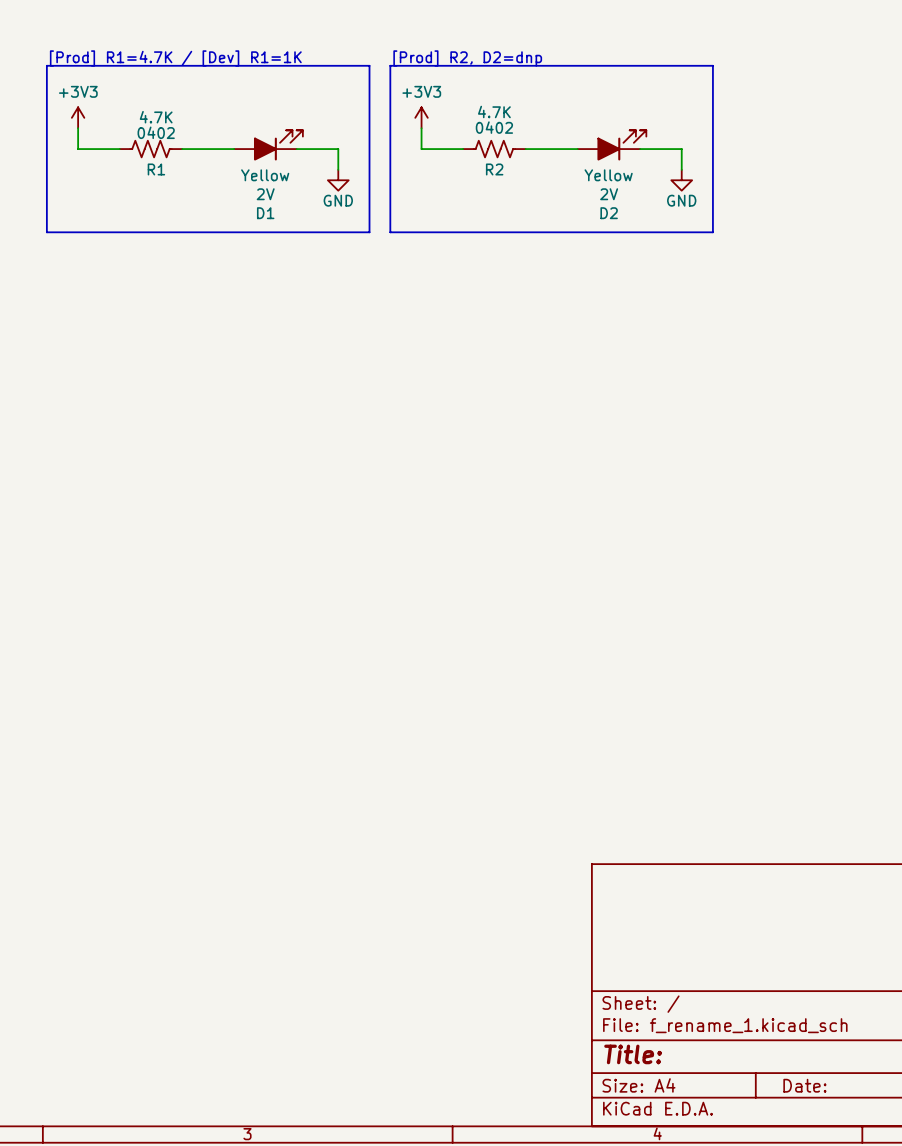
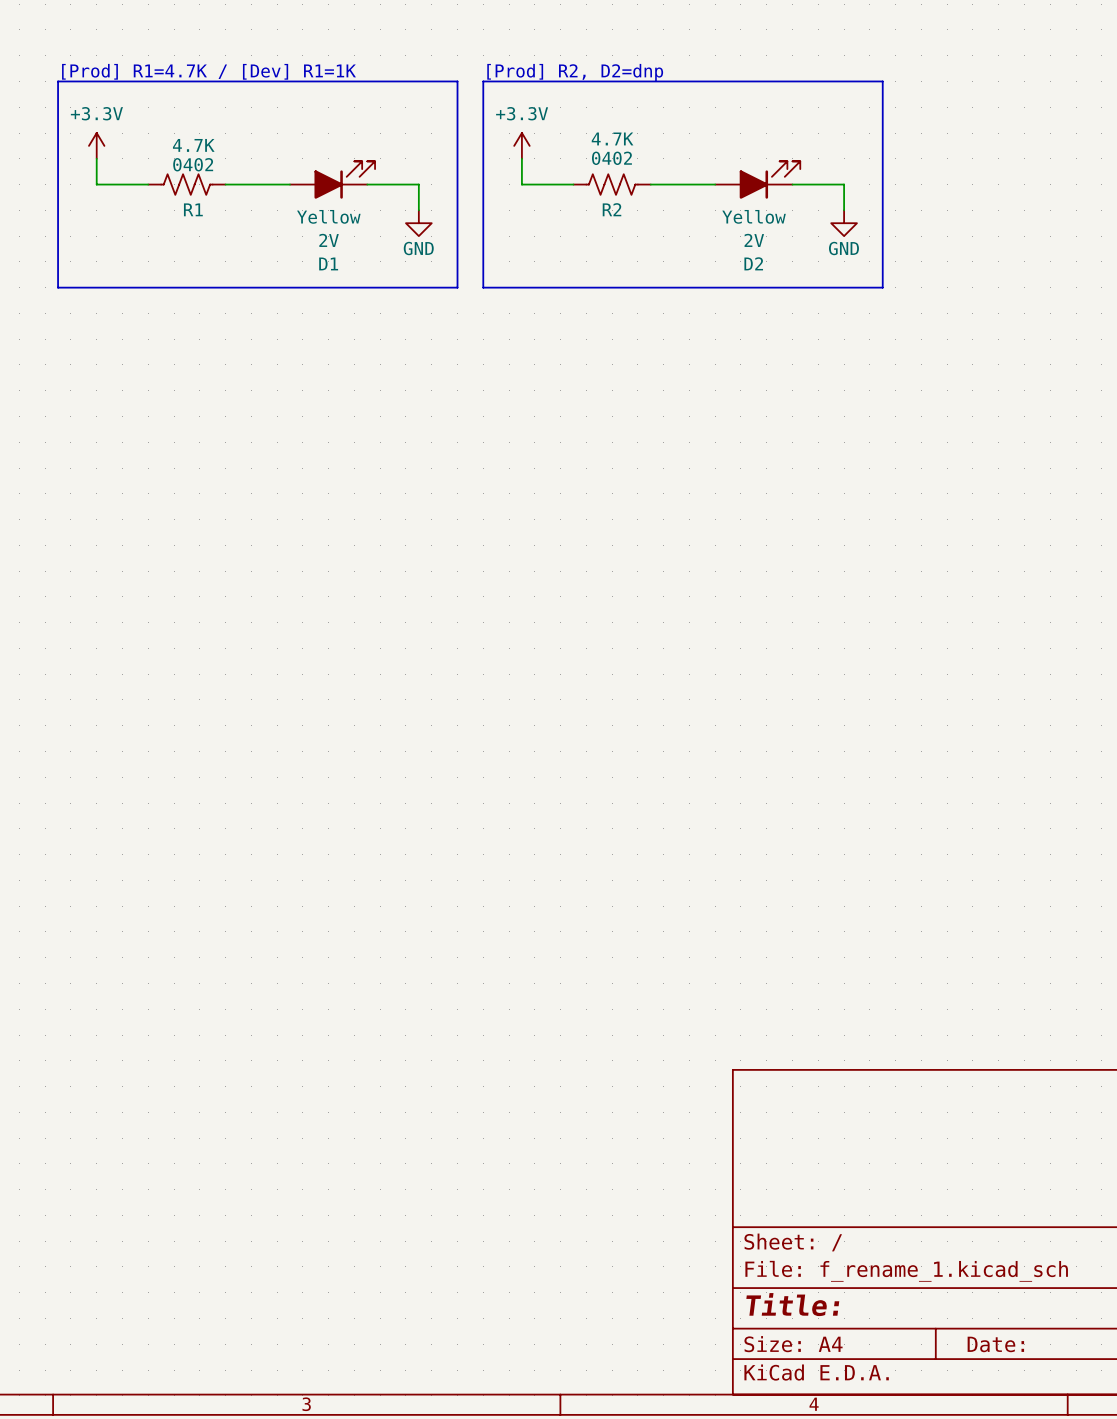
power symbol: +3V3 (78, 117) -> +3.3V (96, 145)
power symbol: +3V3 (421, 117) -> +3.3V (521, 145)

